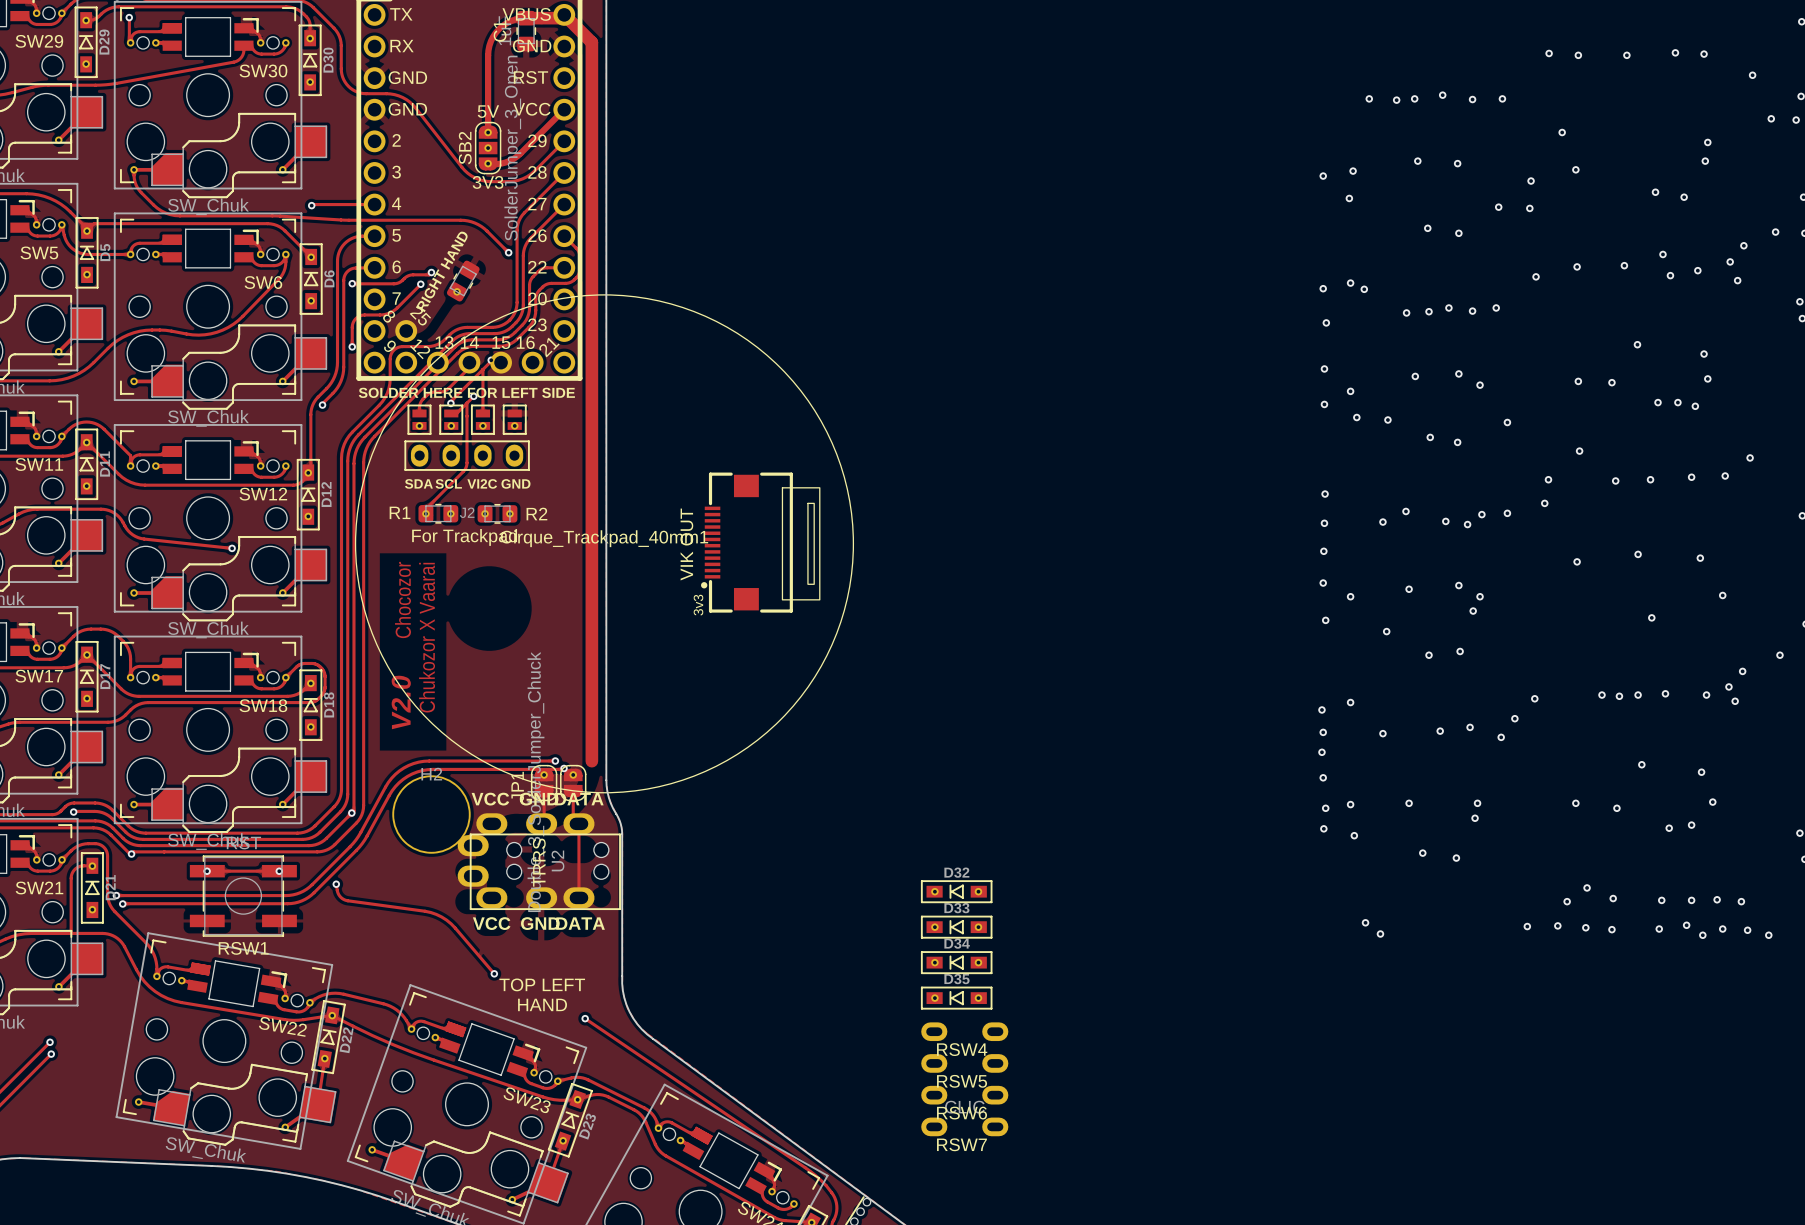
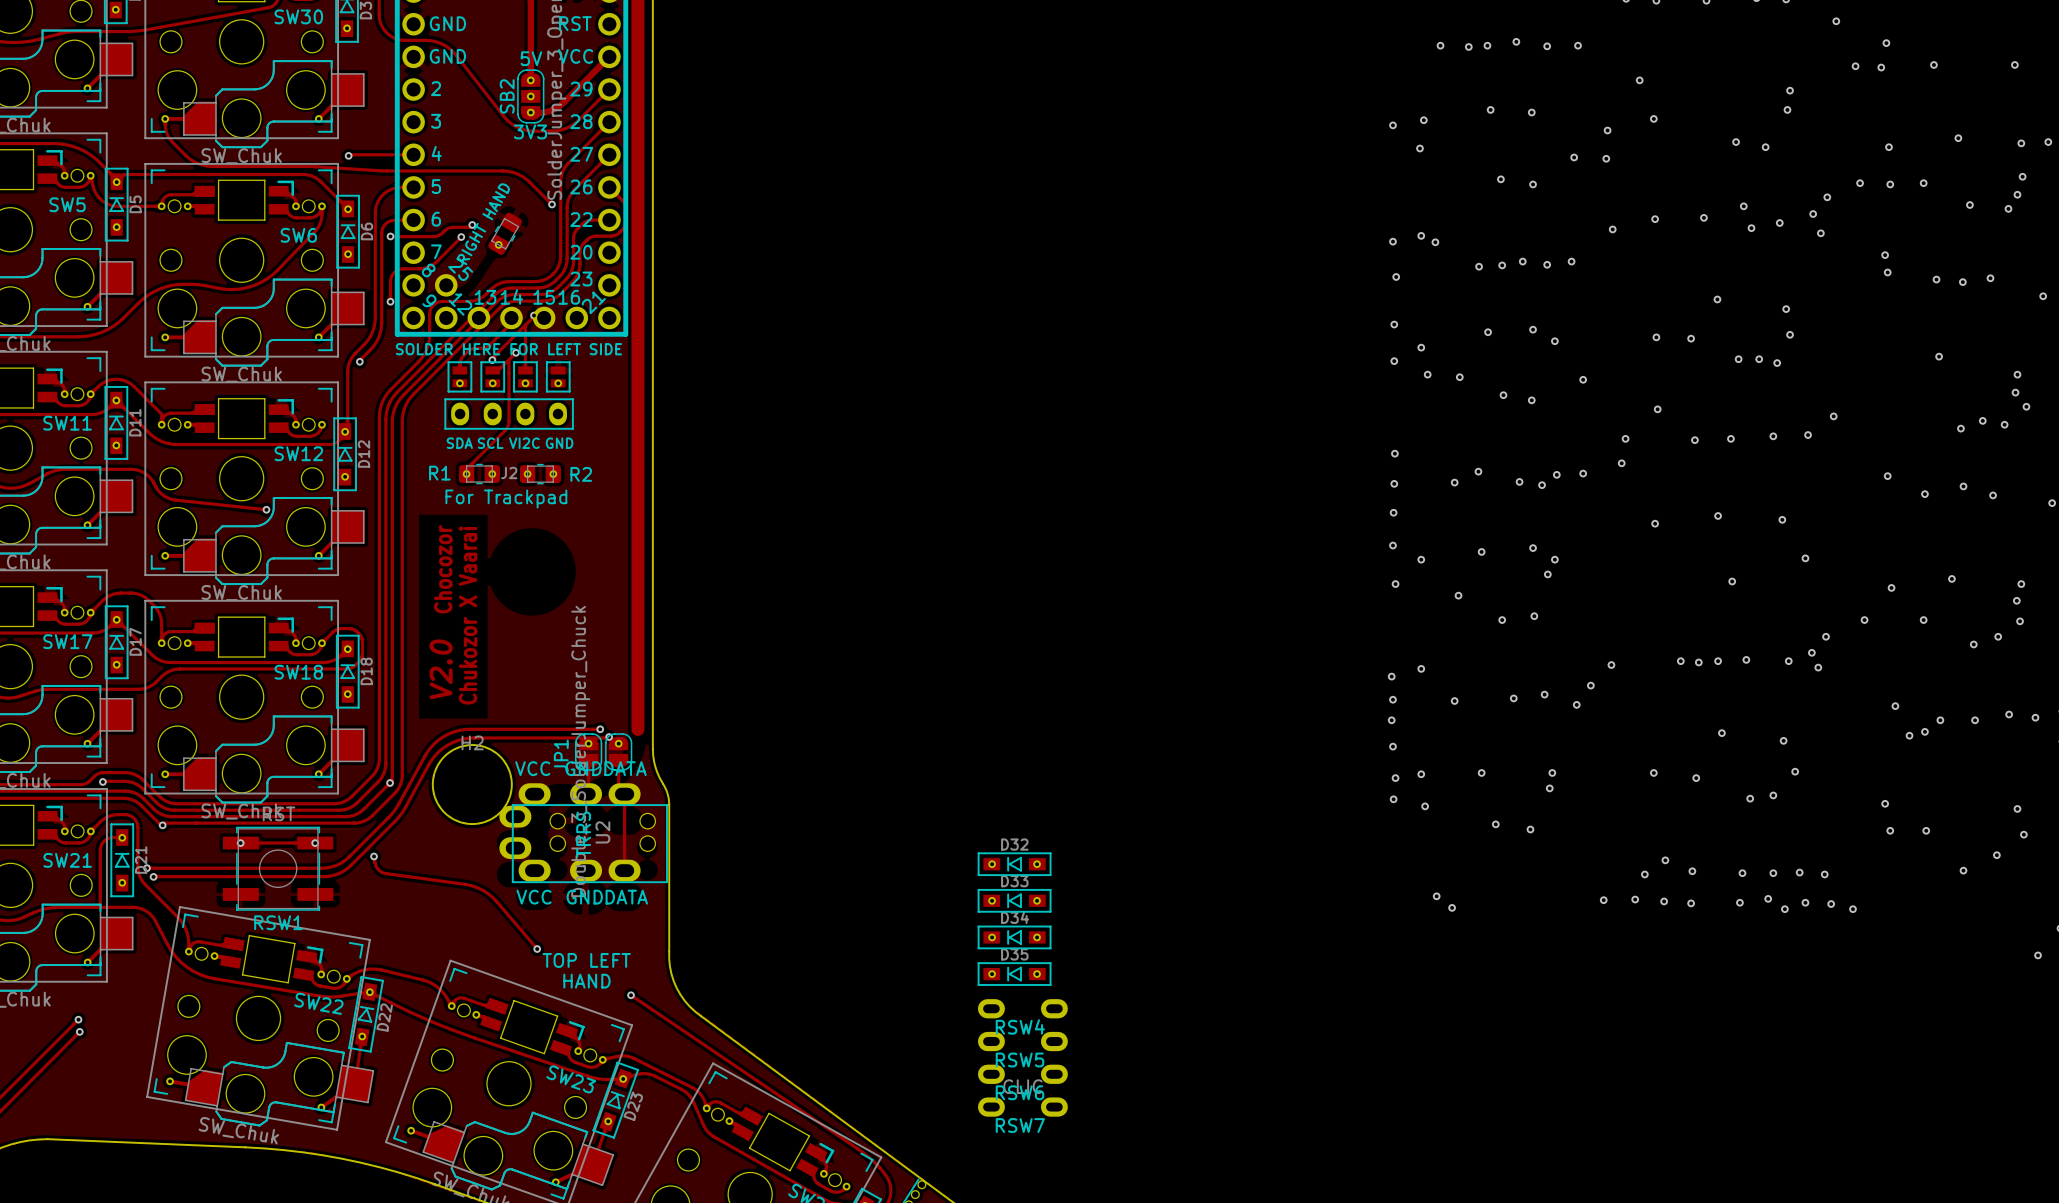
part: (746, 542) -> none
Cirque_Trackpad_40mm1: (604, 543) -> none

